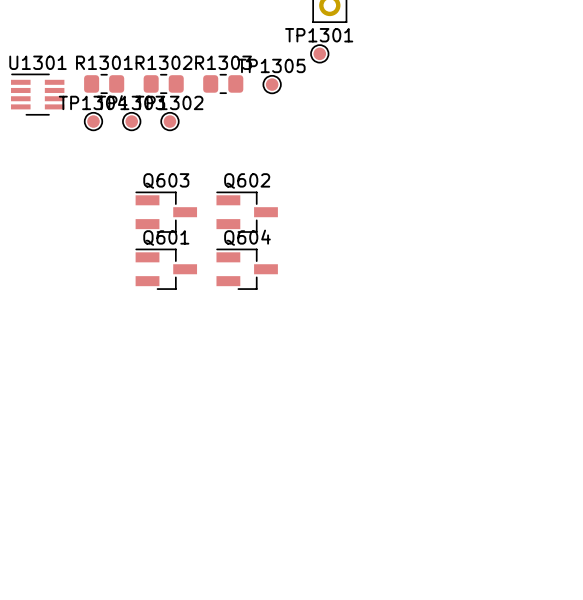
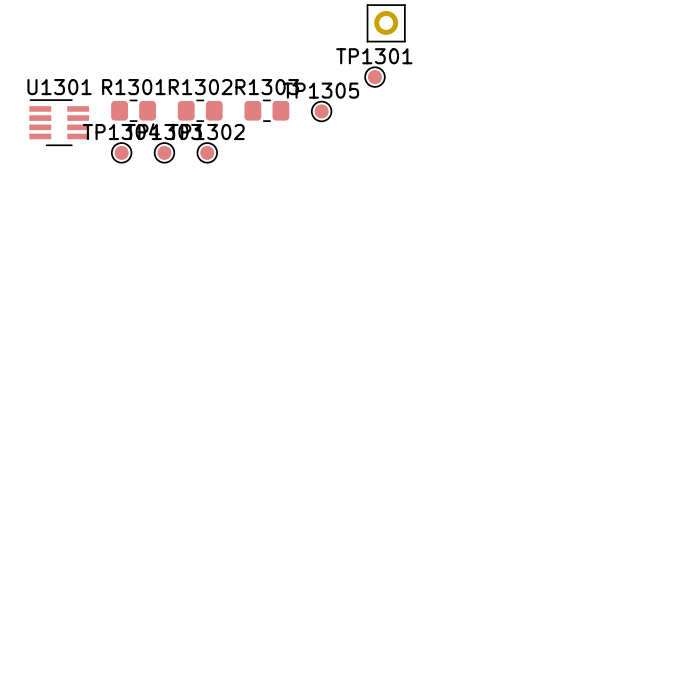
Q603: (166, 212) -> none
Q602: (247, 212) -> none
Q601: (166, 269) -> none
Q604: (247, 269) -> none

